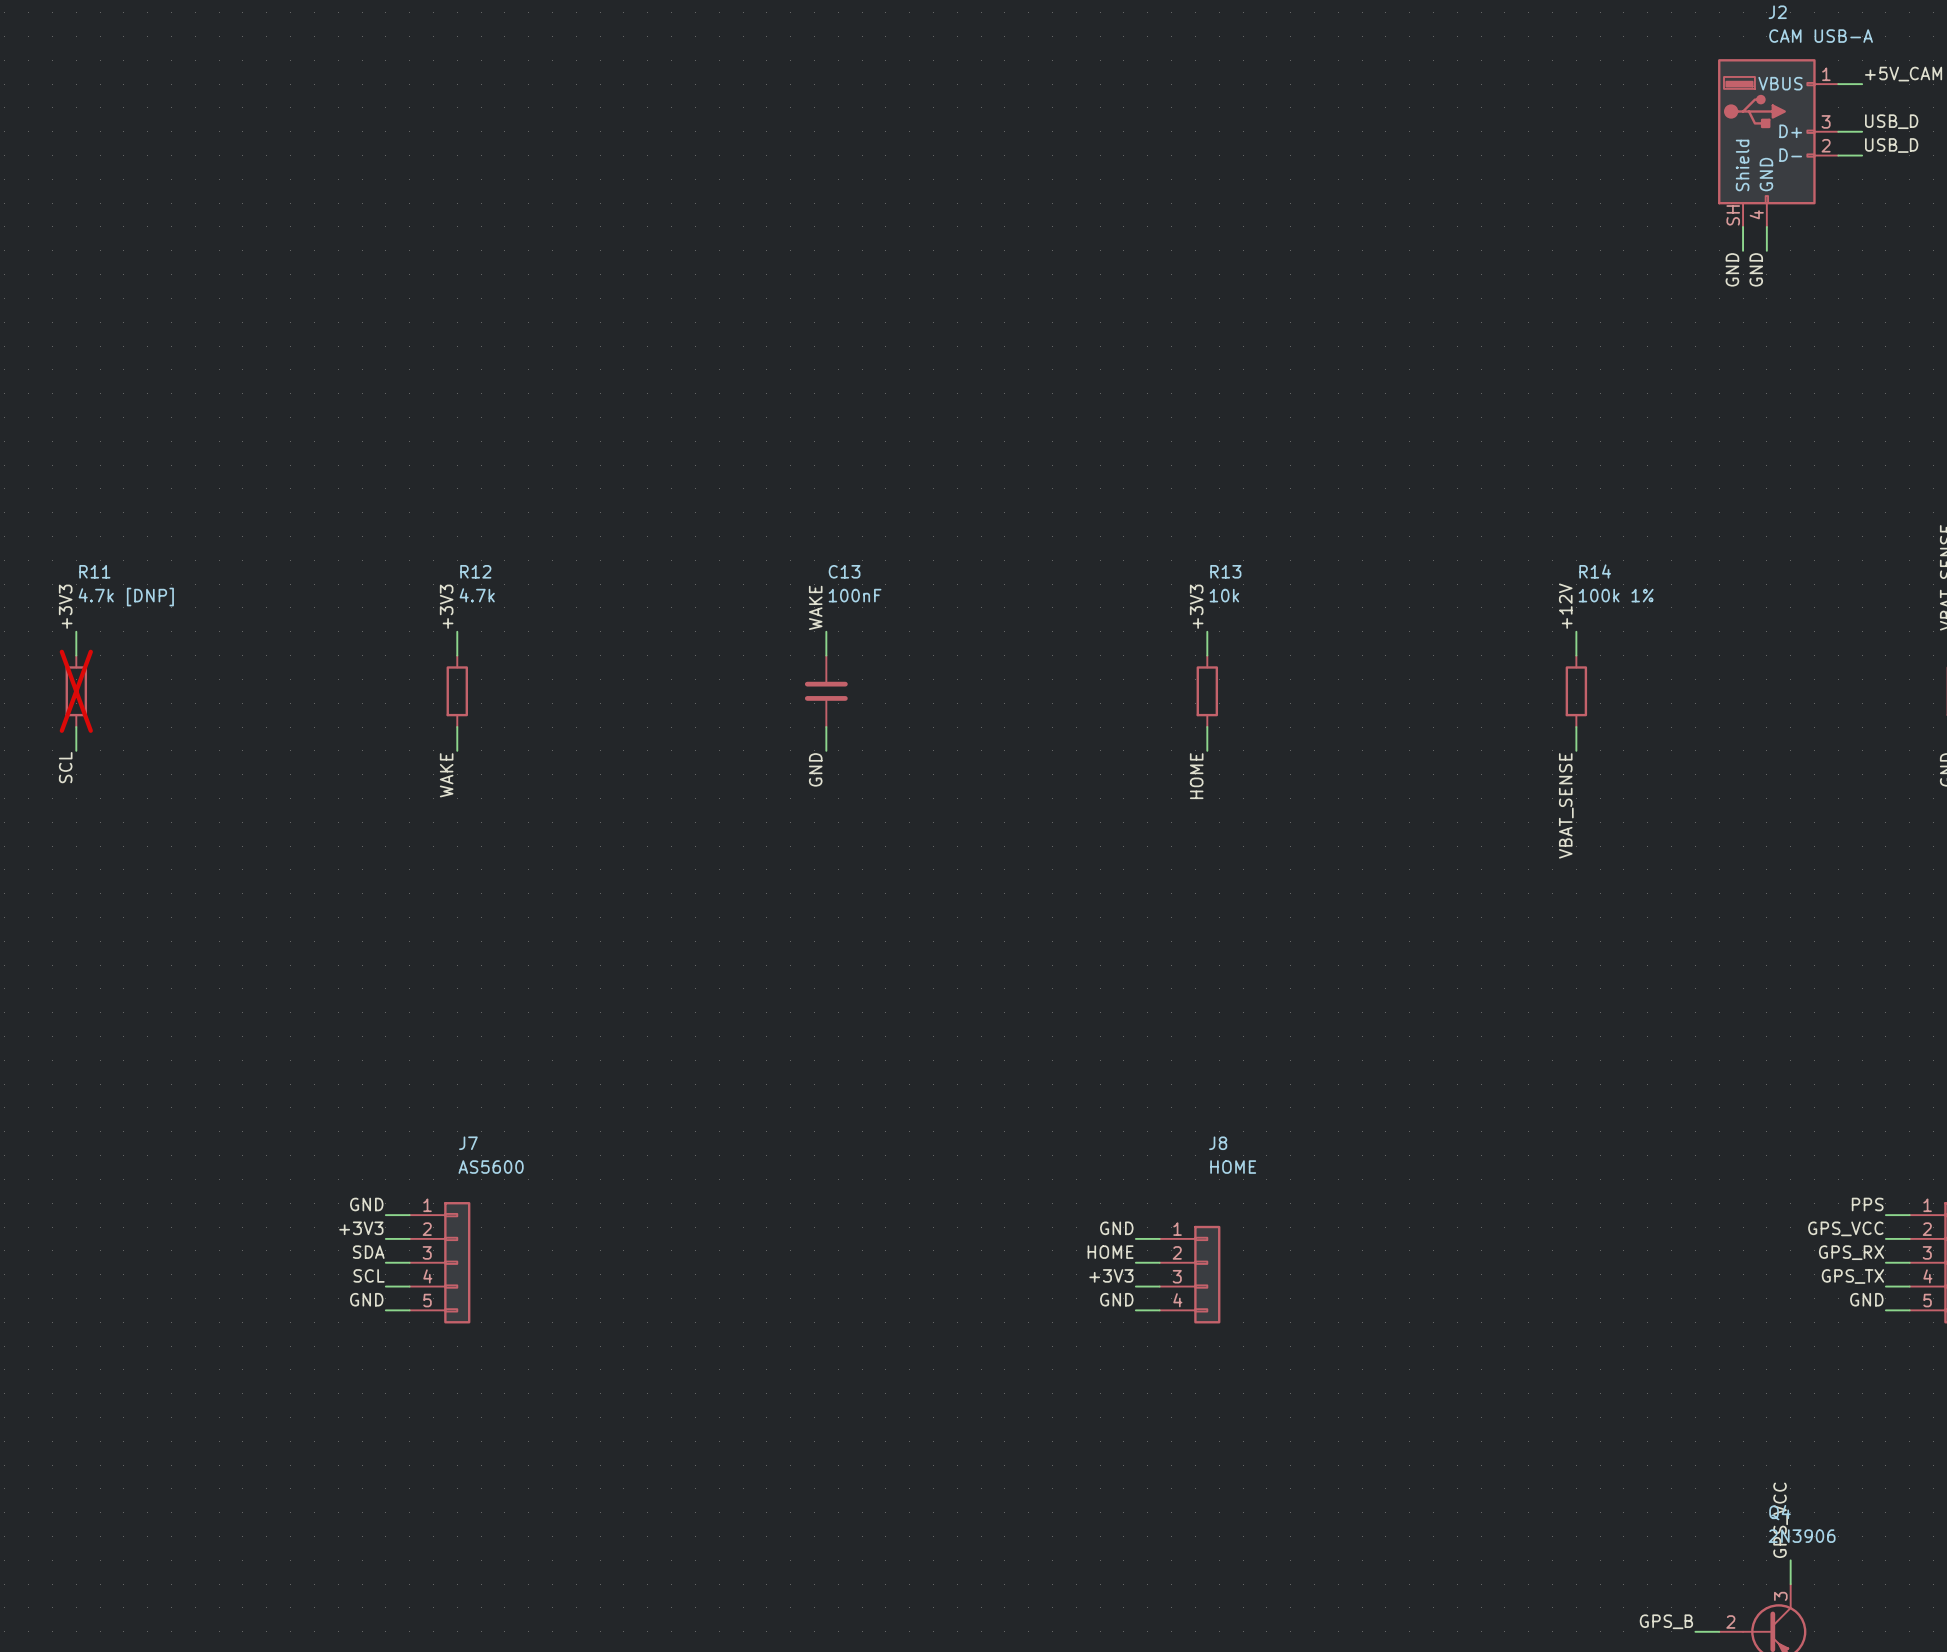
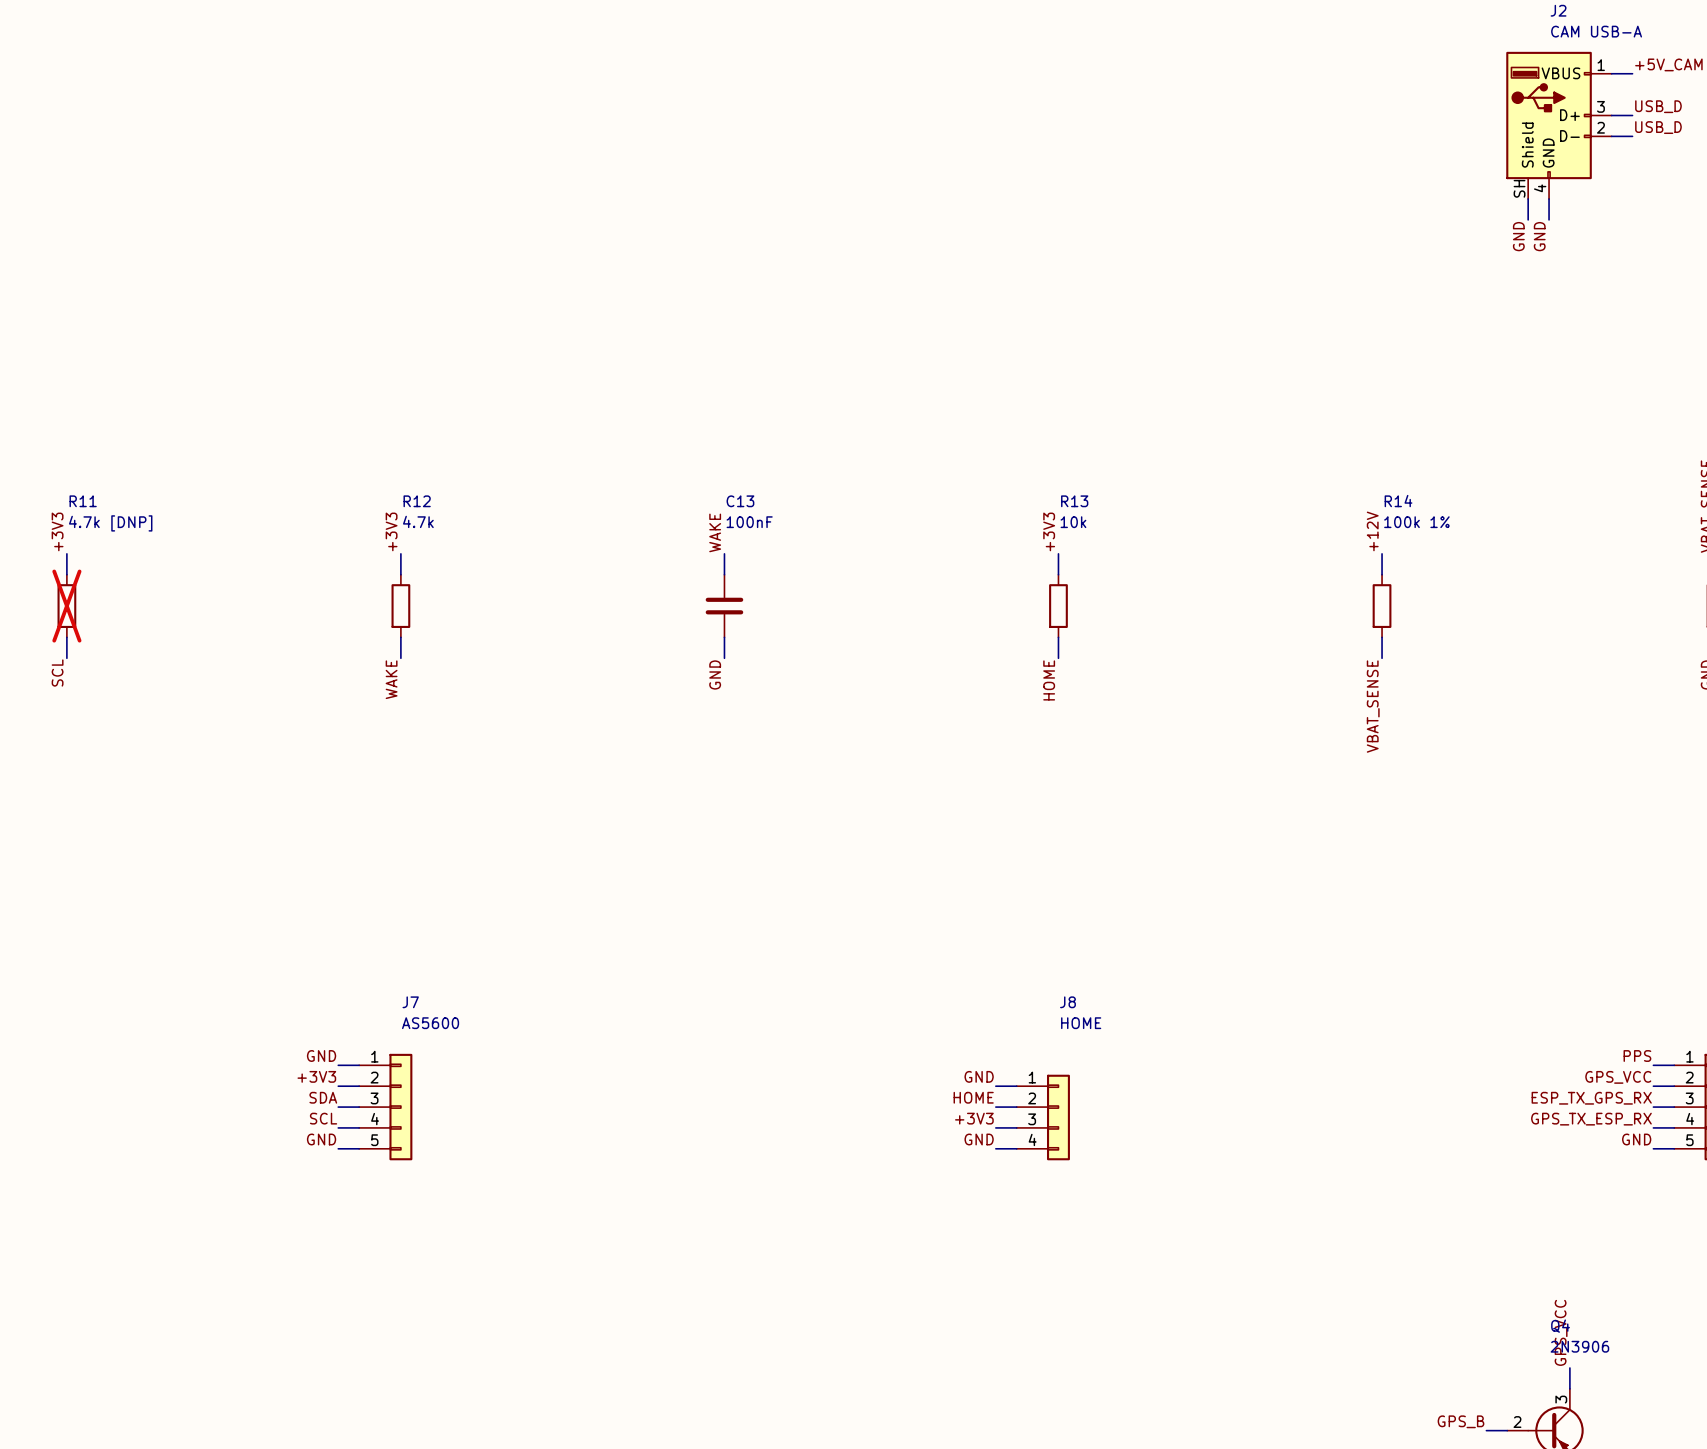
label: GPS_RX (1851, 1252) -> ESP_TX_GPS_RX (1591, 1098)
label: GPS_TX (1852, 1276) -> GPS_TX_ESP_RX (1591, 1119)

